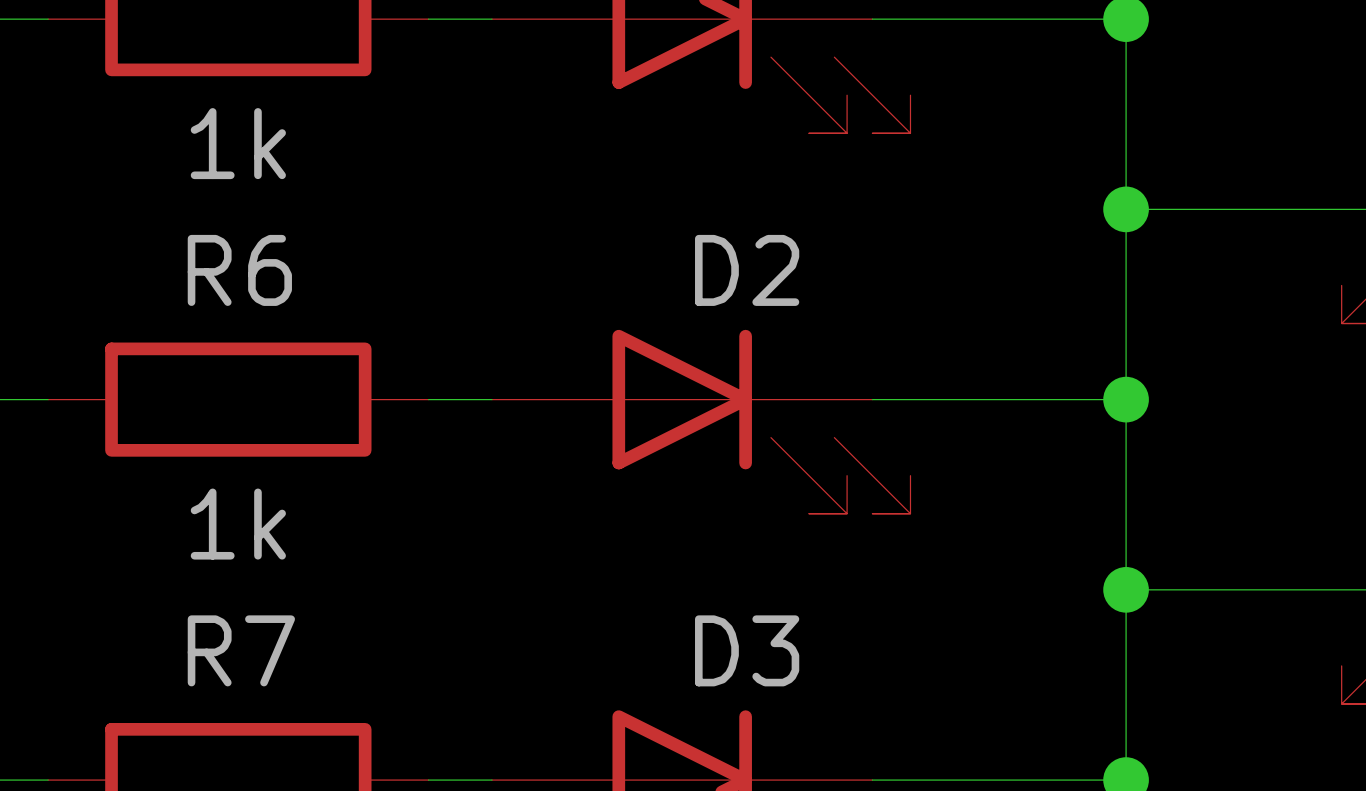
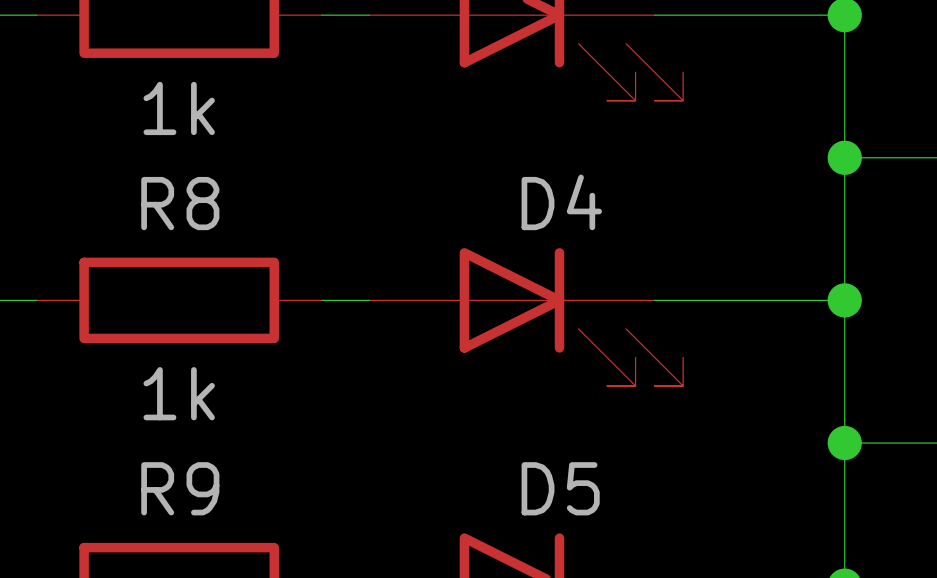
R6 name: R6 (239, 270) -> R8 (180, 203)
D2 name: D2 (747, 270) -> D4 (561, 202)
R7 name: R7 (241, 650) -> R9 (180, 488)
D3 name: D3 (747, 650) -> D5 (560, 488)

